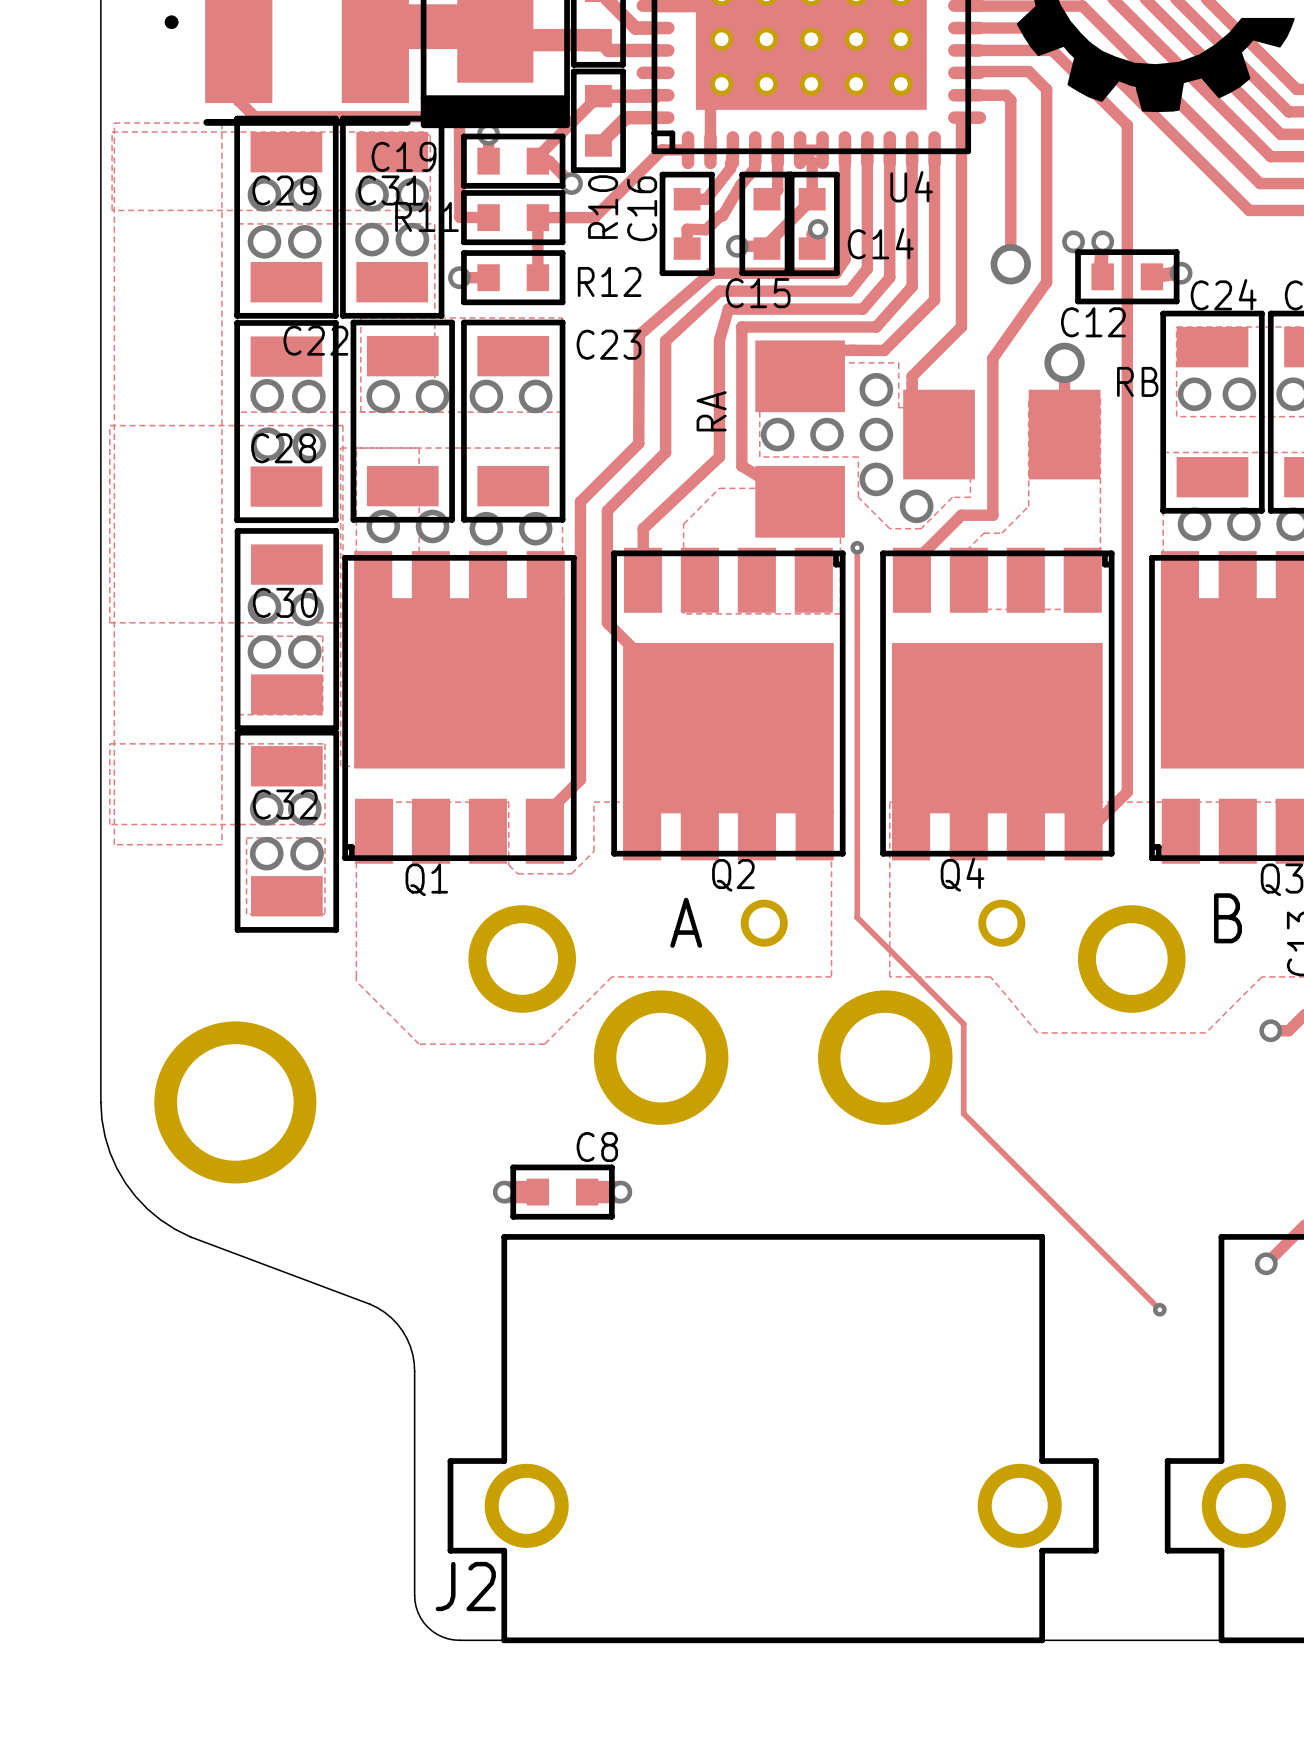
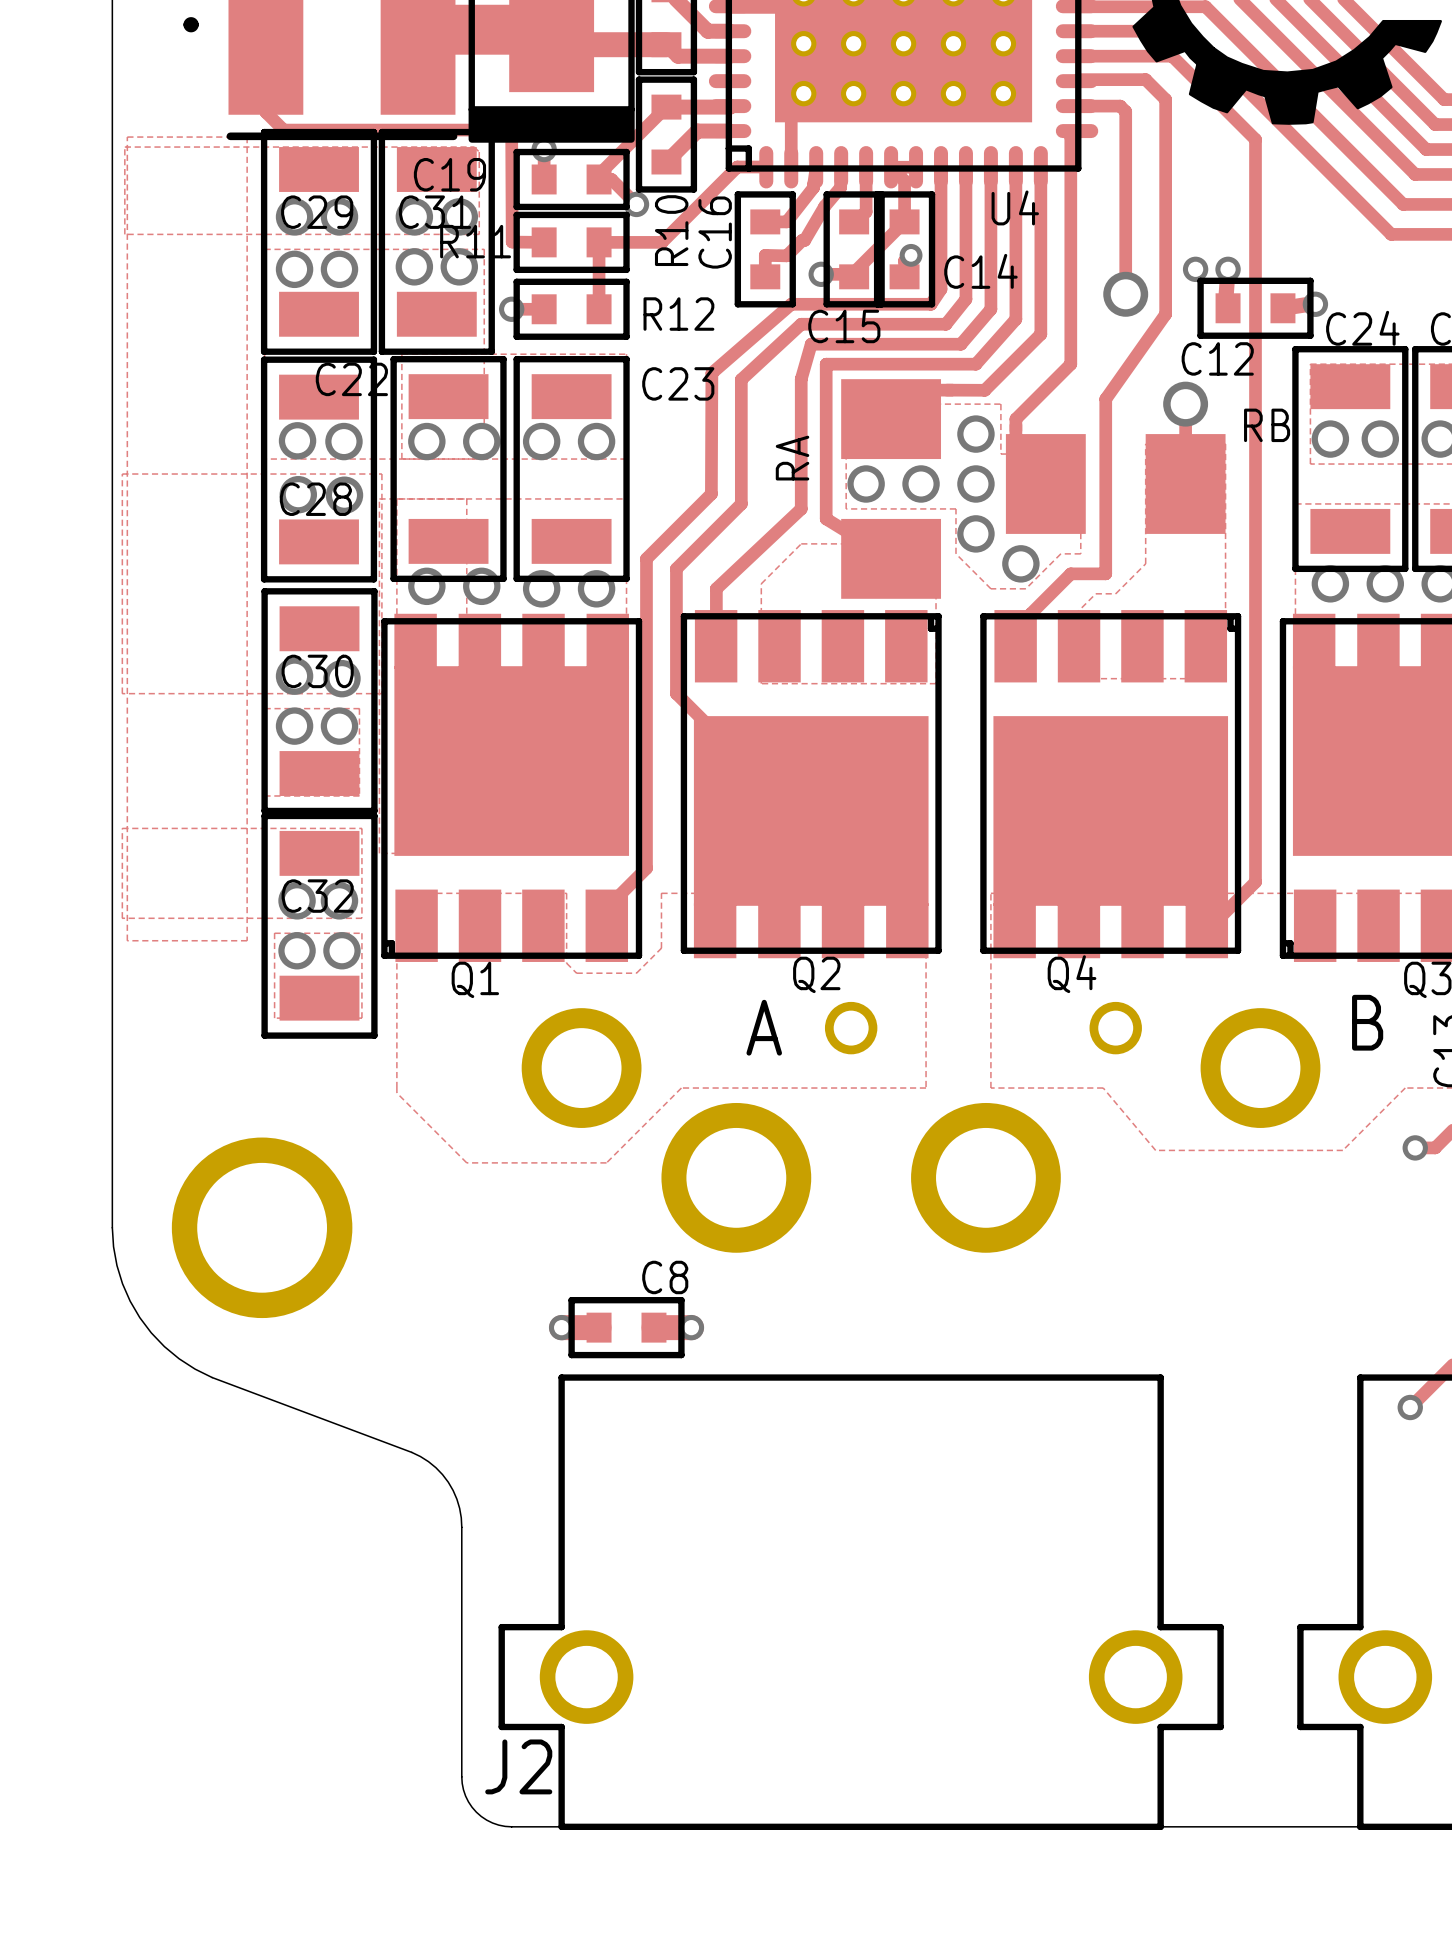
track: (857, 547) (857, 917) (963, 1024) (963, 1113) (1159, 1309) -> none
via: (857, 547) -> none
via: (1159, 1309) -> none

